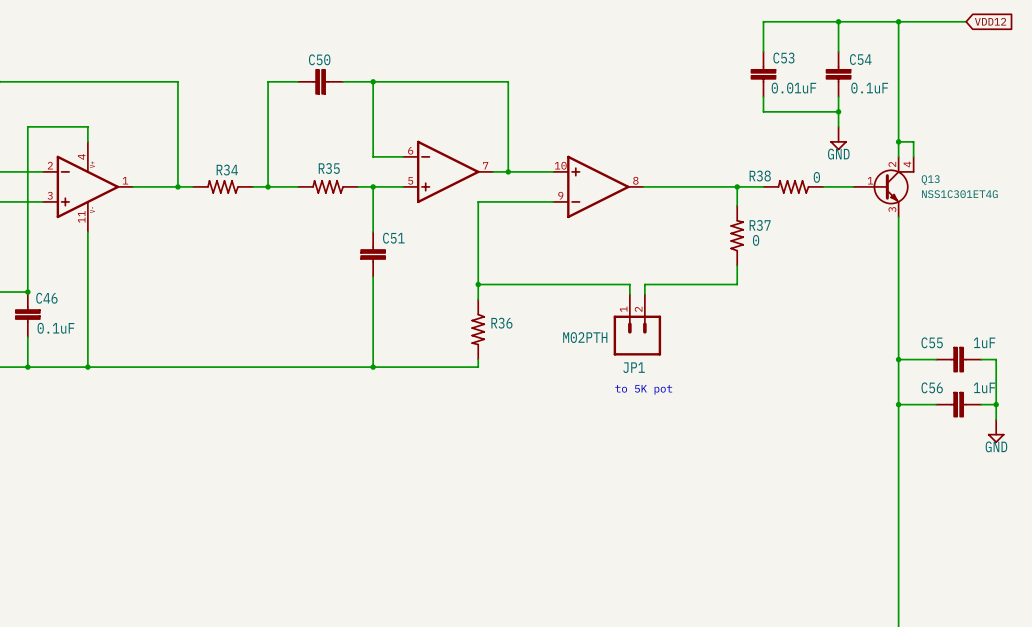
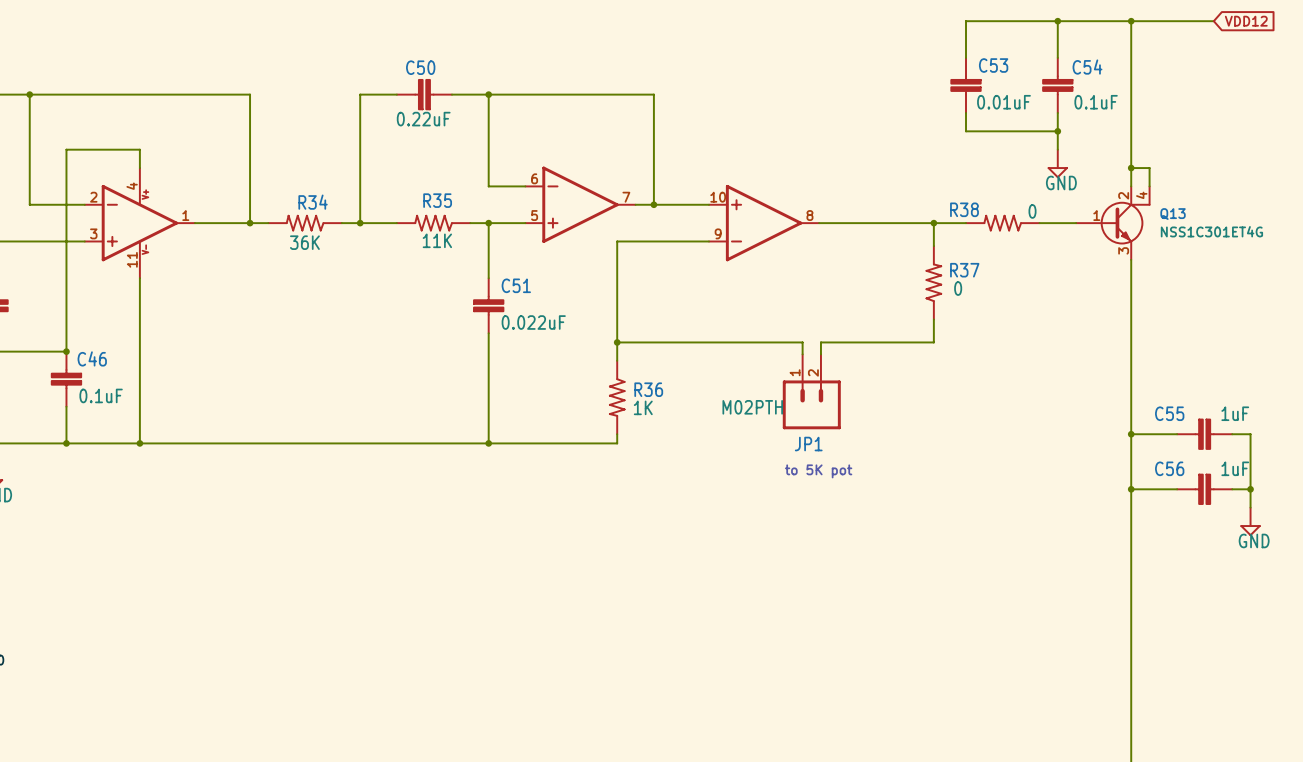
C50 value: none -> 0.22uF (423, 119)
R35 value: none -> 11K (437, 240)
R34 value: none -> 36K (304, 242)
C51 value: none -> 0.022uF (533, 322)
R36 value: none -> 1K (643, 407)

